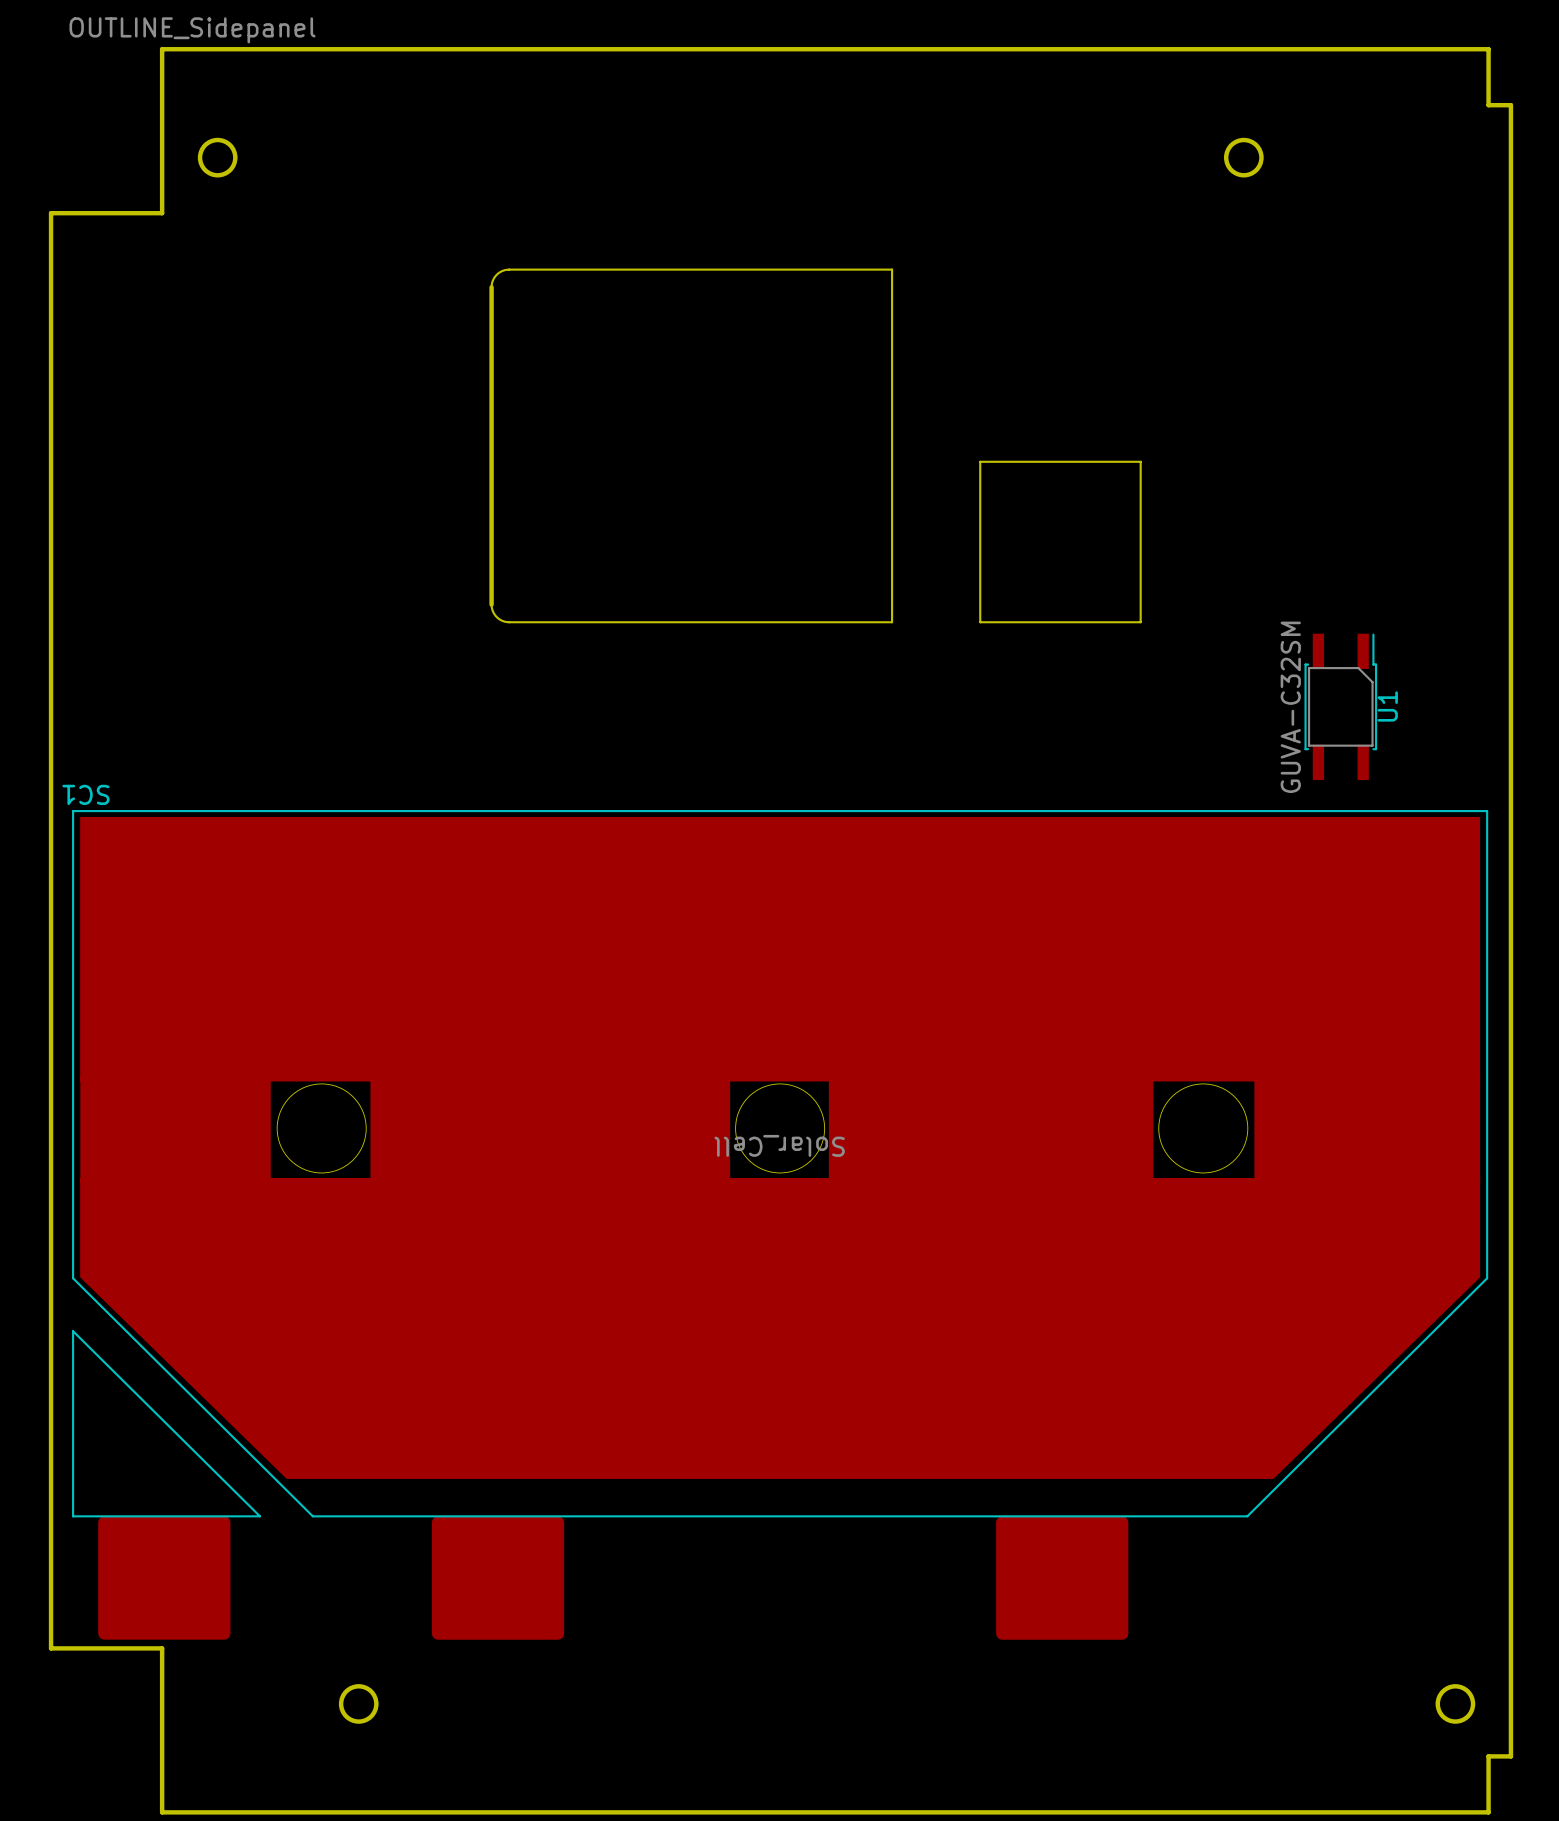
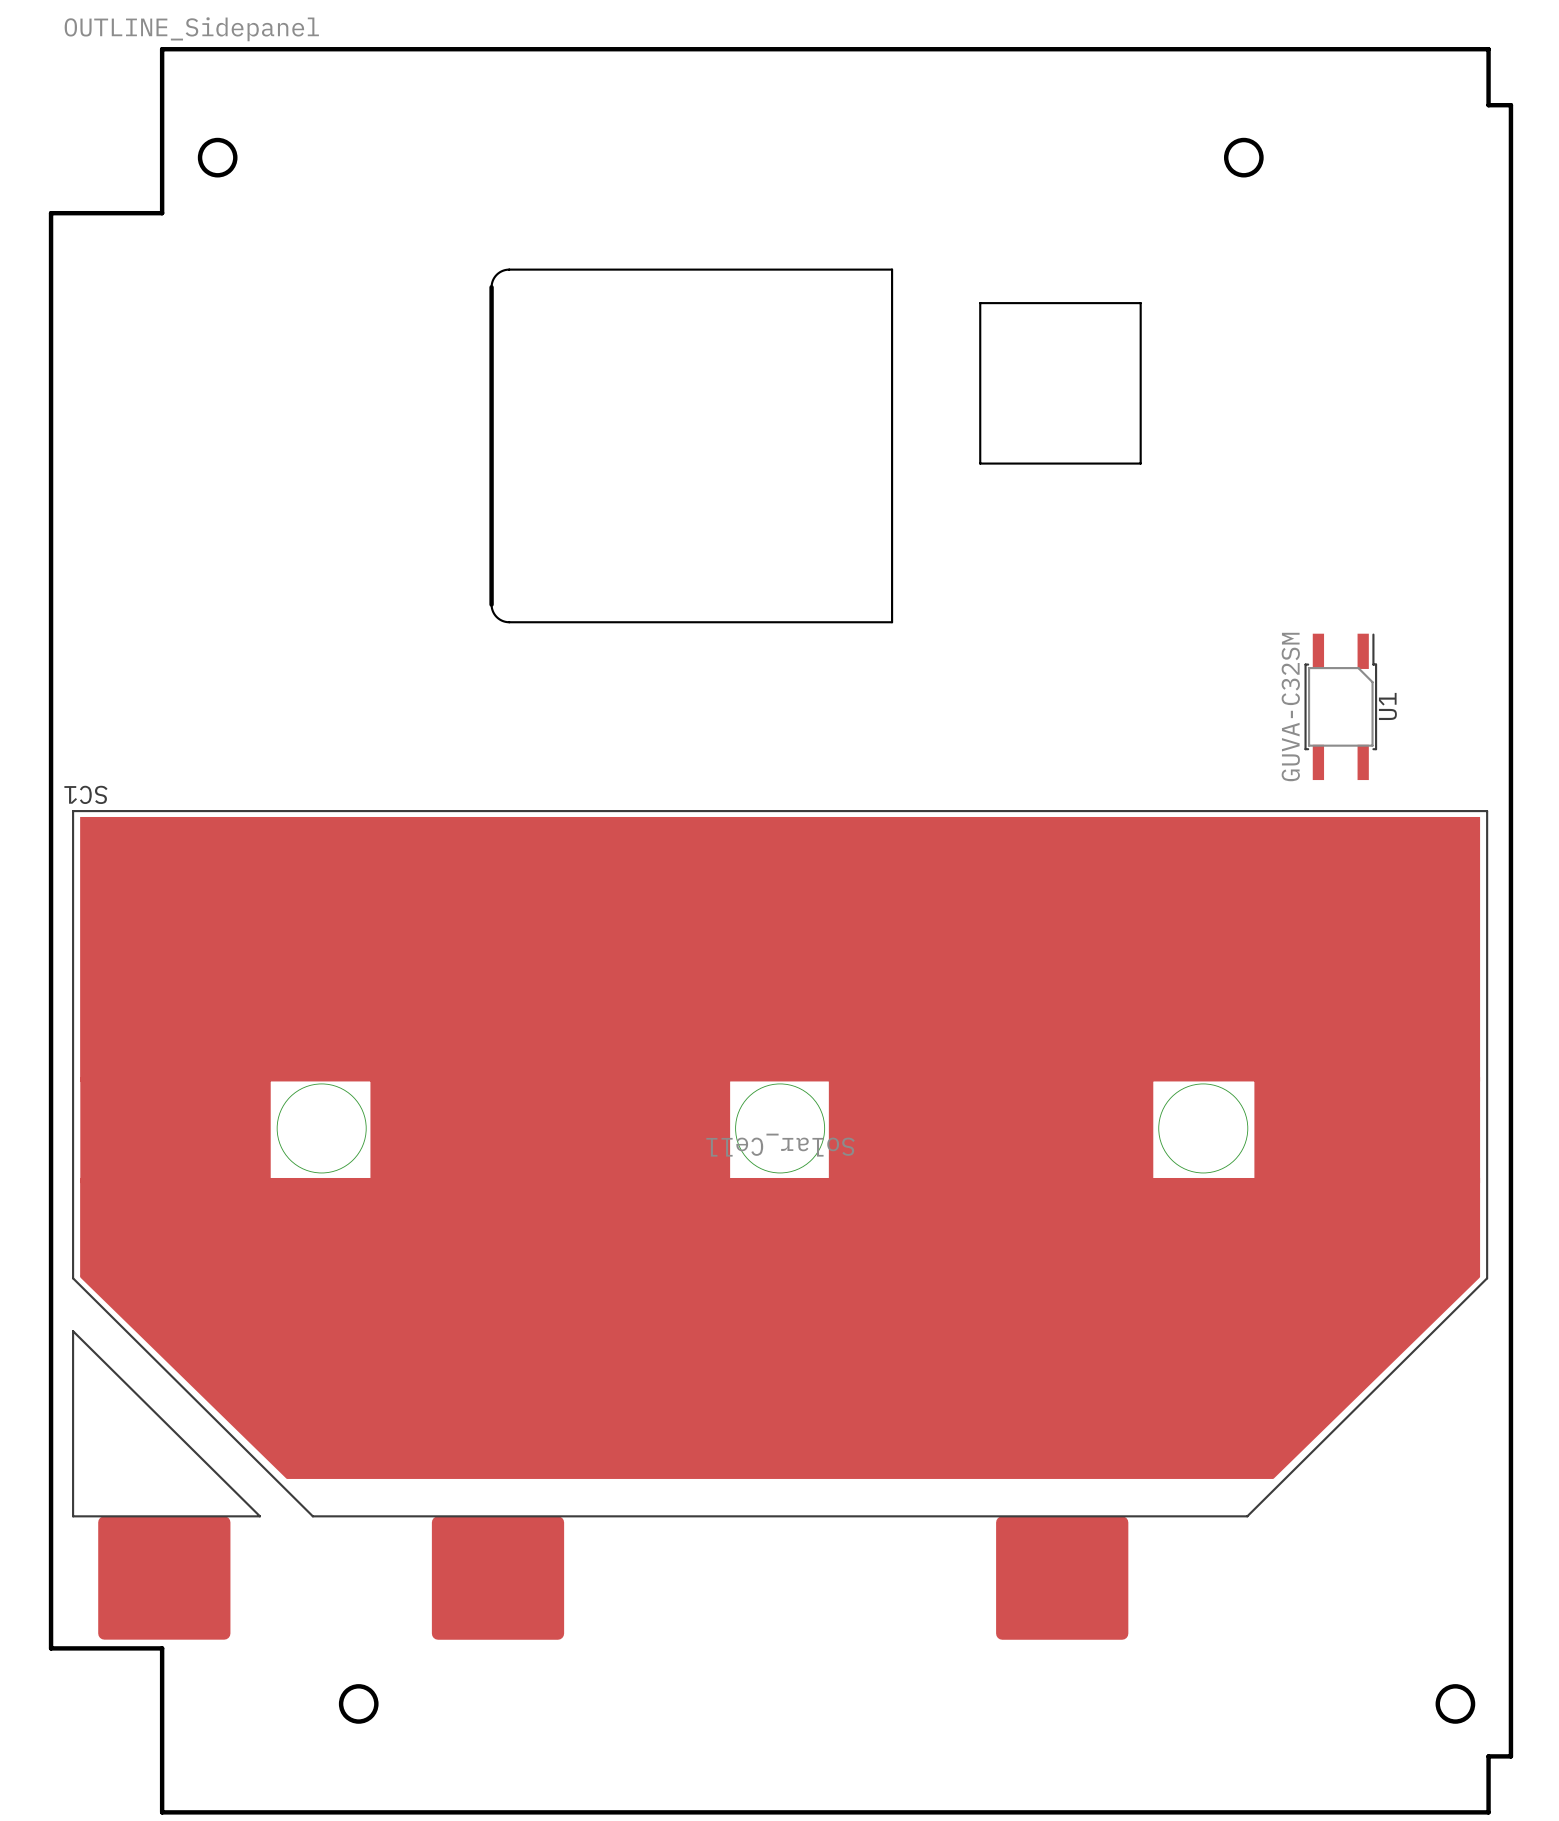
drawing shape: [48, 17, 1514, 1815] -> [48, 17, 1514, 1815]

